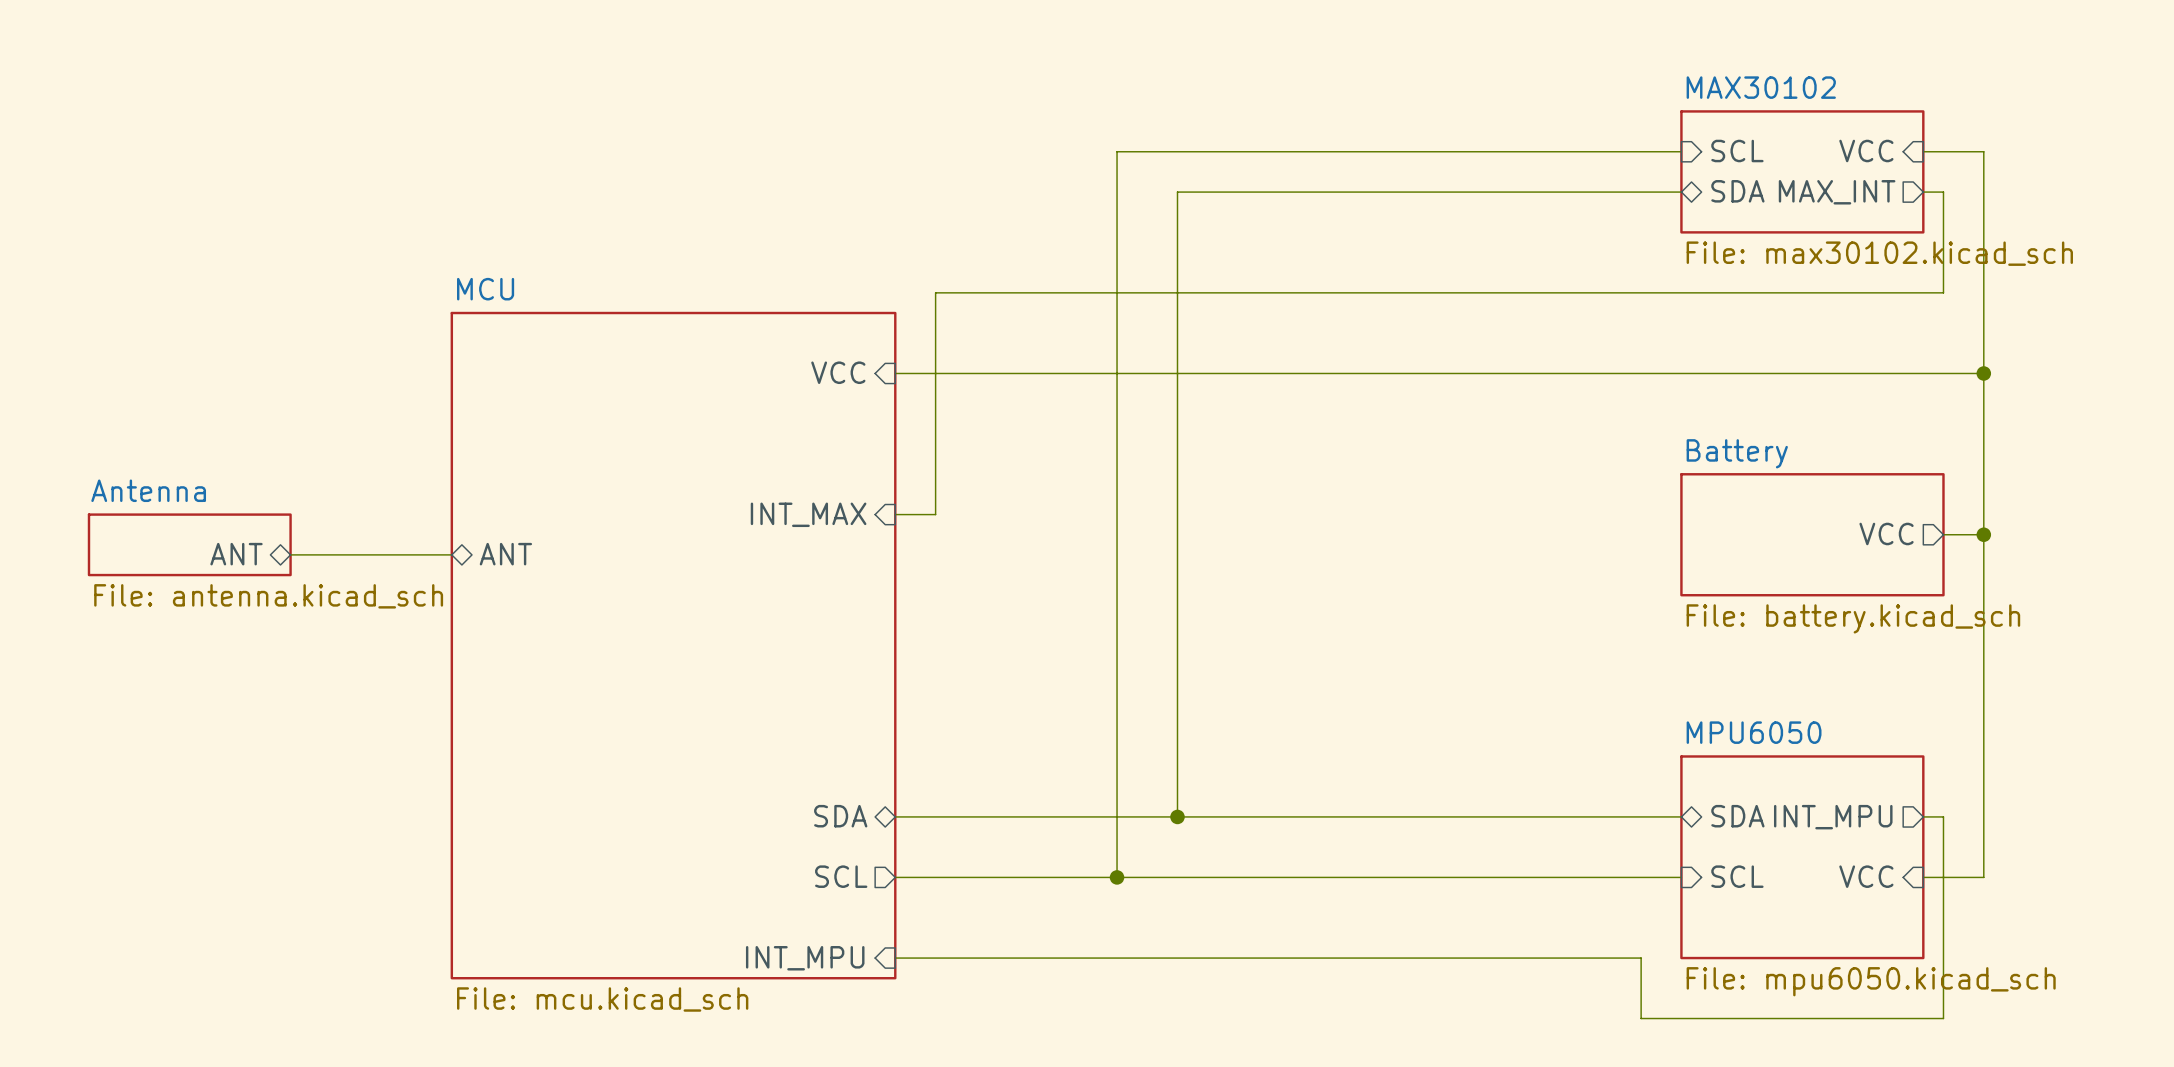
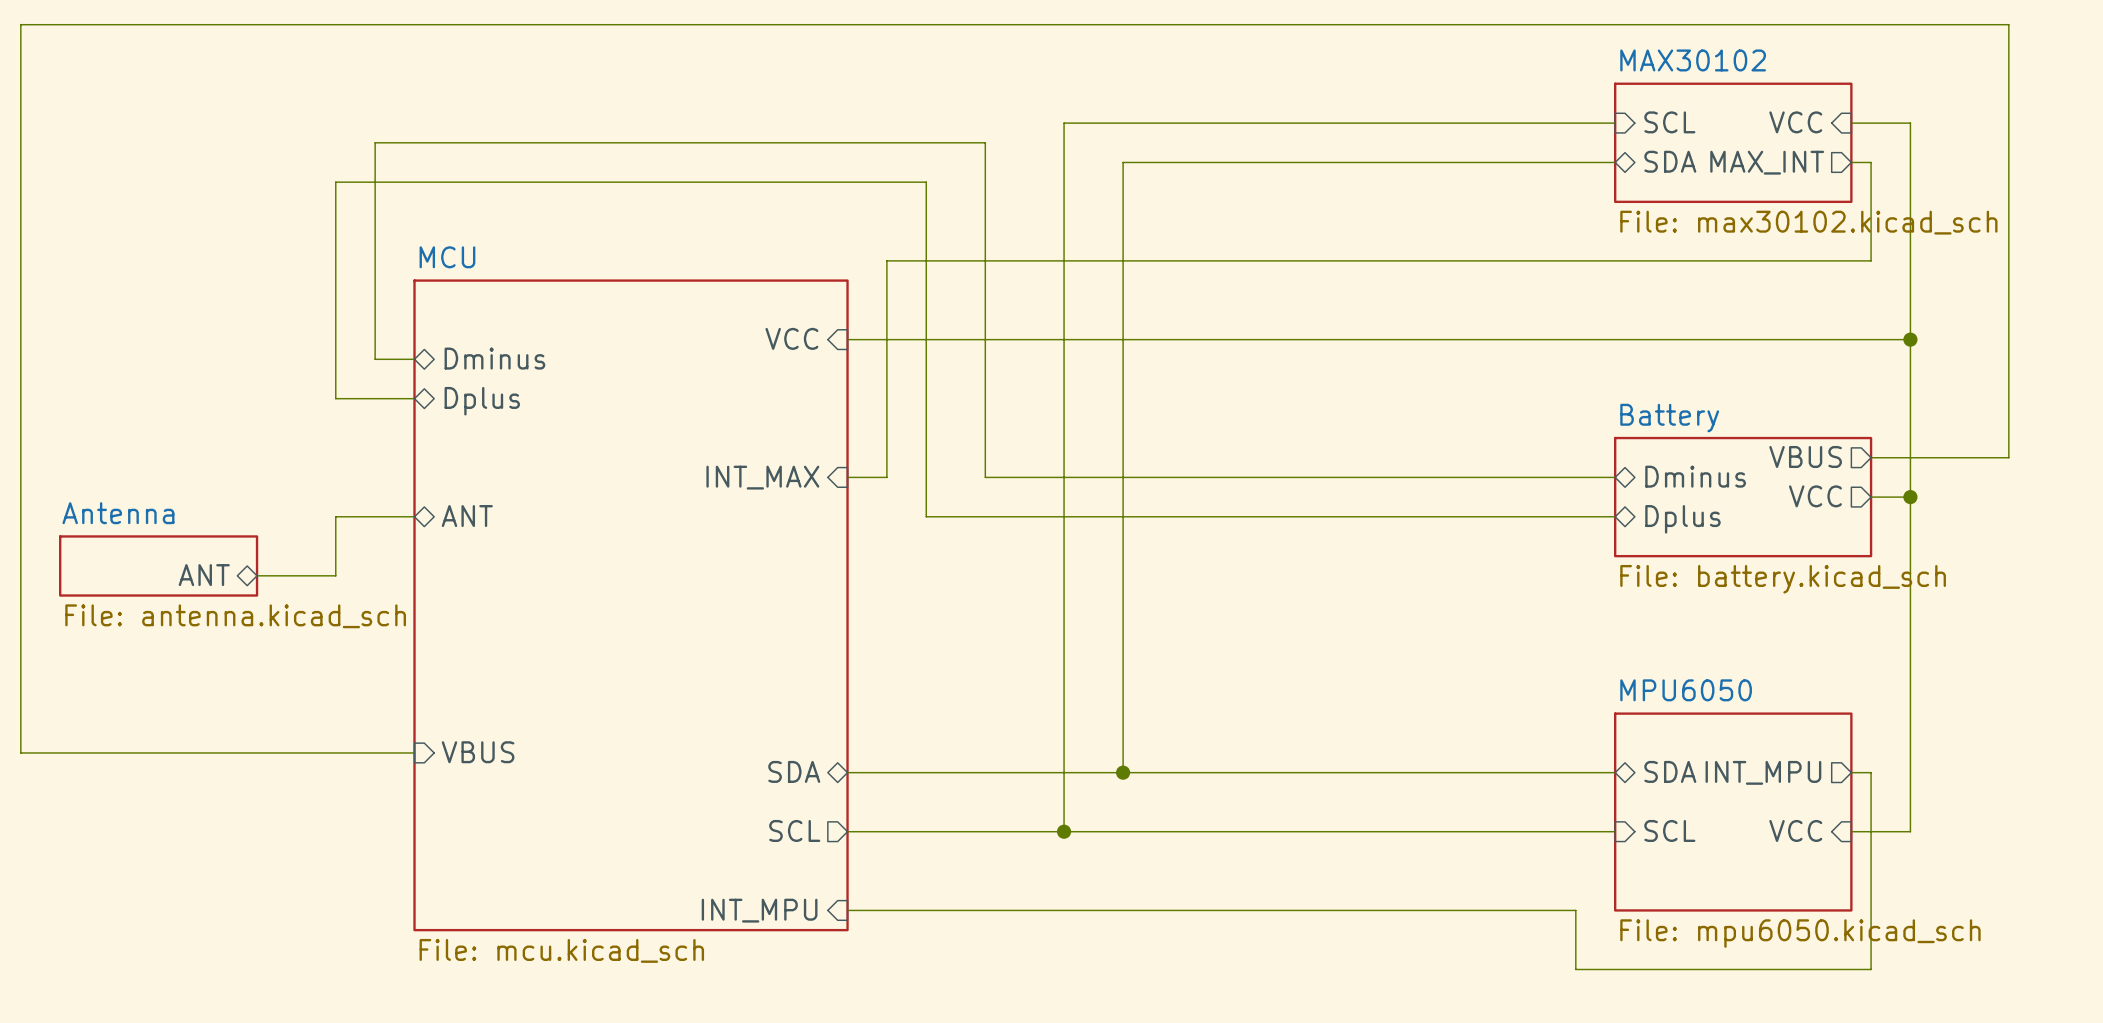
sheet pin: none -> Dminus (494, 358)
wire: none -> (414, 359) (375, 359) (375, 142) (985, 142) (985, 477) (1615, 477)
wire: none -> (414, 398) (335, 398) (335, 182) (926, 182) (926, 516) (1615, 516)
sheet pin: none -> Dplus (482, 401)
sheet pin: none -> VBUS (1805, 456)
wire: none -> (1871, 457) (2008, 457) (2008, 24) (20, 24) (20, 752) (414, 752)
sheet pin: none -> Dminus (1695, 476)
sheet Antenna position: (189, 544) -> (158, 565)
sheet pin position: ANT (236, 554) -> ANT (204, 575)
wire: (290, 554) (371, 554) -> (257, 575) (335, 575) (335, 516)
sheet pin: none -> Dplus (1682, 519)
sheet pin: none -> VBUS (478, 752)

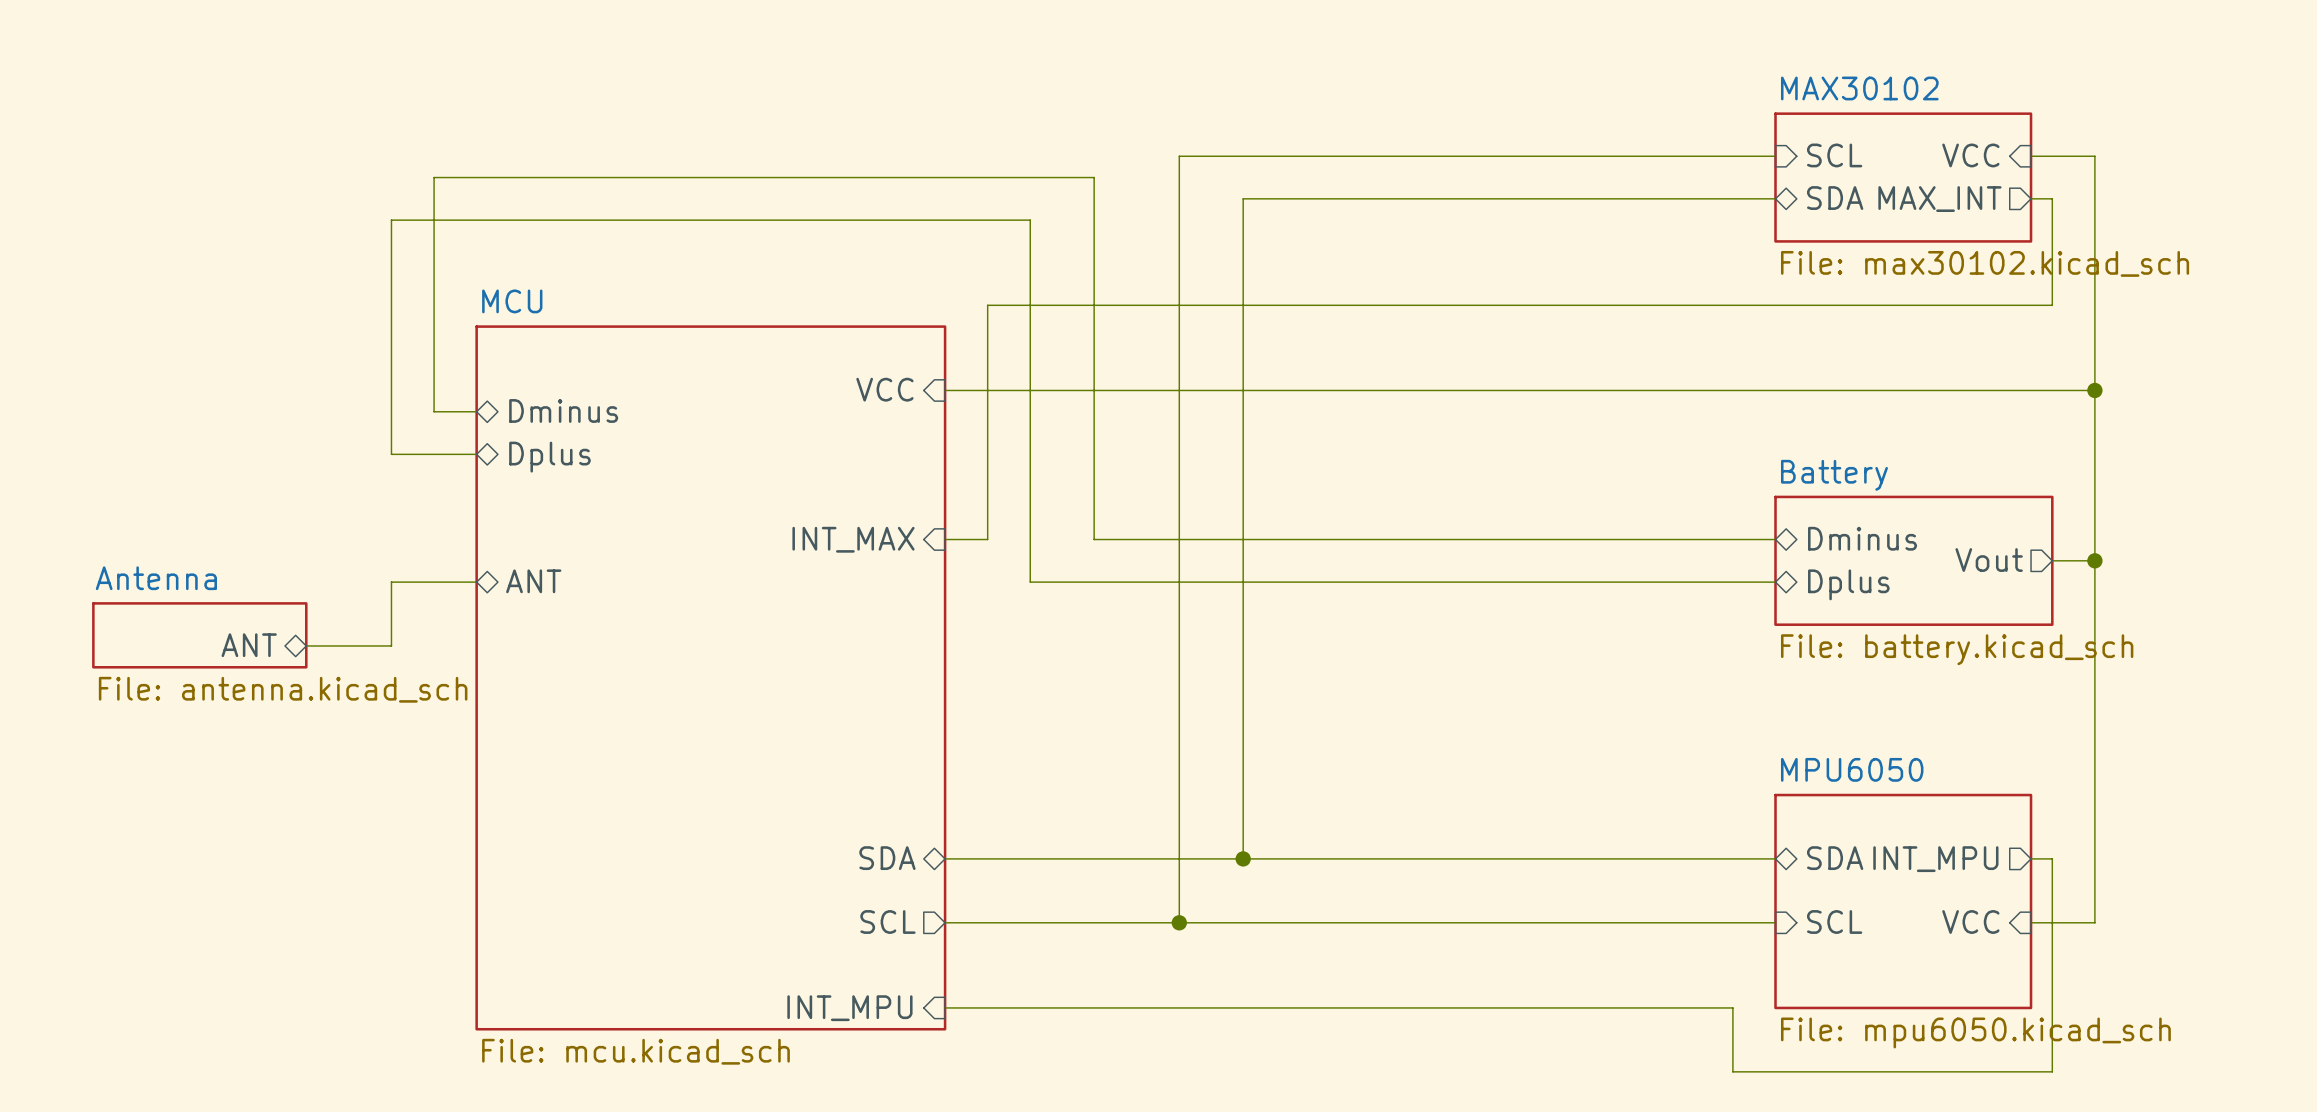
sheet pin: VBUS (1805, 456) -> none
wire: (1871, 457) (2008, 457) (2008, 24) (20, 24) (20, 752) (414, 752) -> none
sheet pin: VCC (1815, 496) -> Vout (1989, 560)
sheet pin: VBUS (478, 752) -> none

